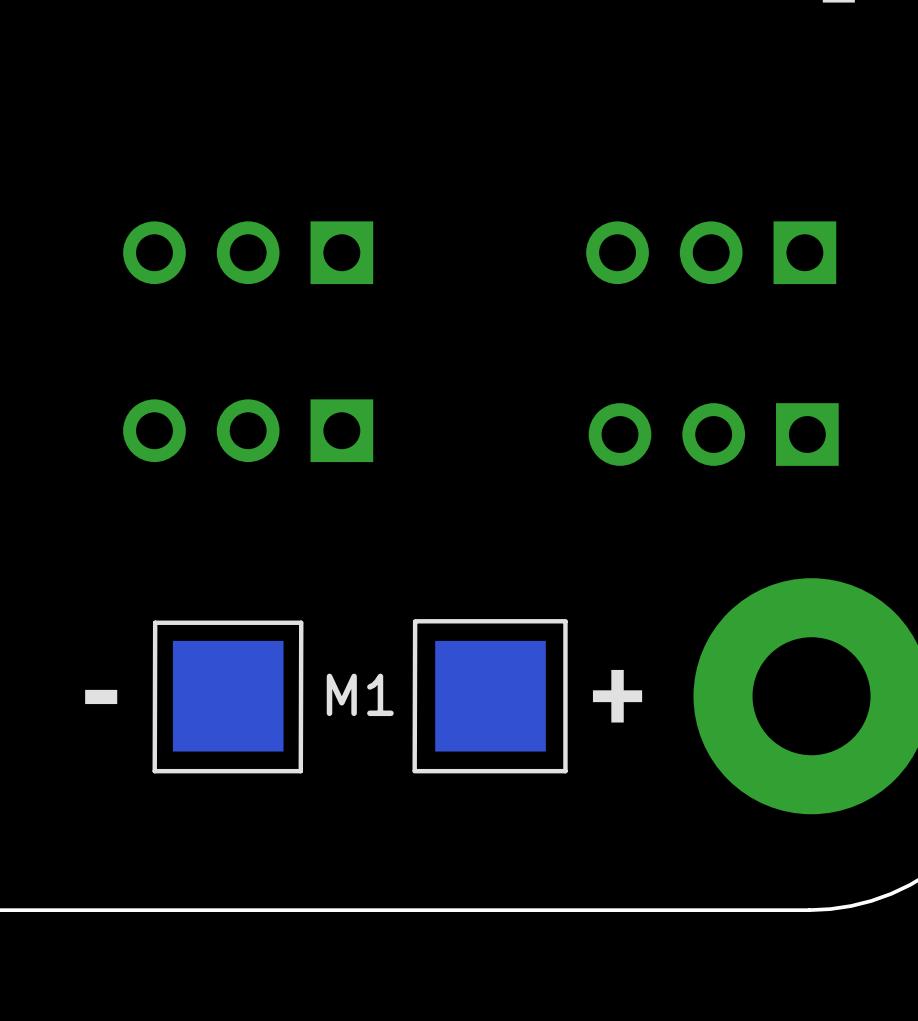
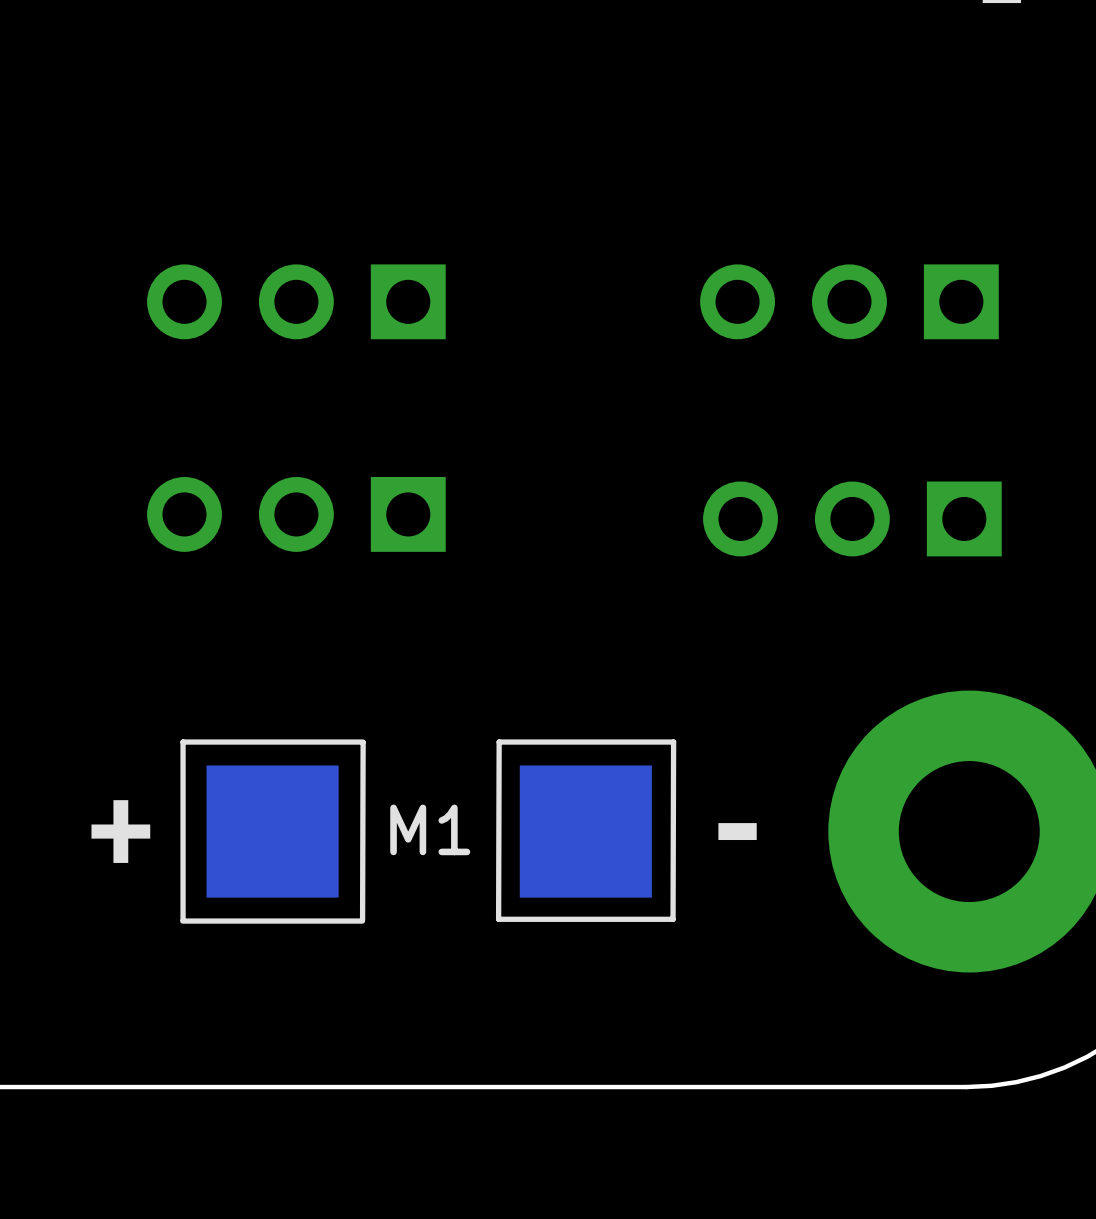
drawing position: (101, 696) -> (737, 831)
M1 rotation: 0° (360, 696) -> 180° (428, 831)
drawing position: (617, 696) -> (120, 831)

